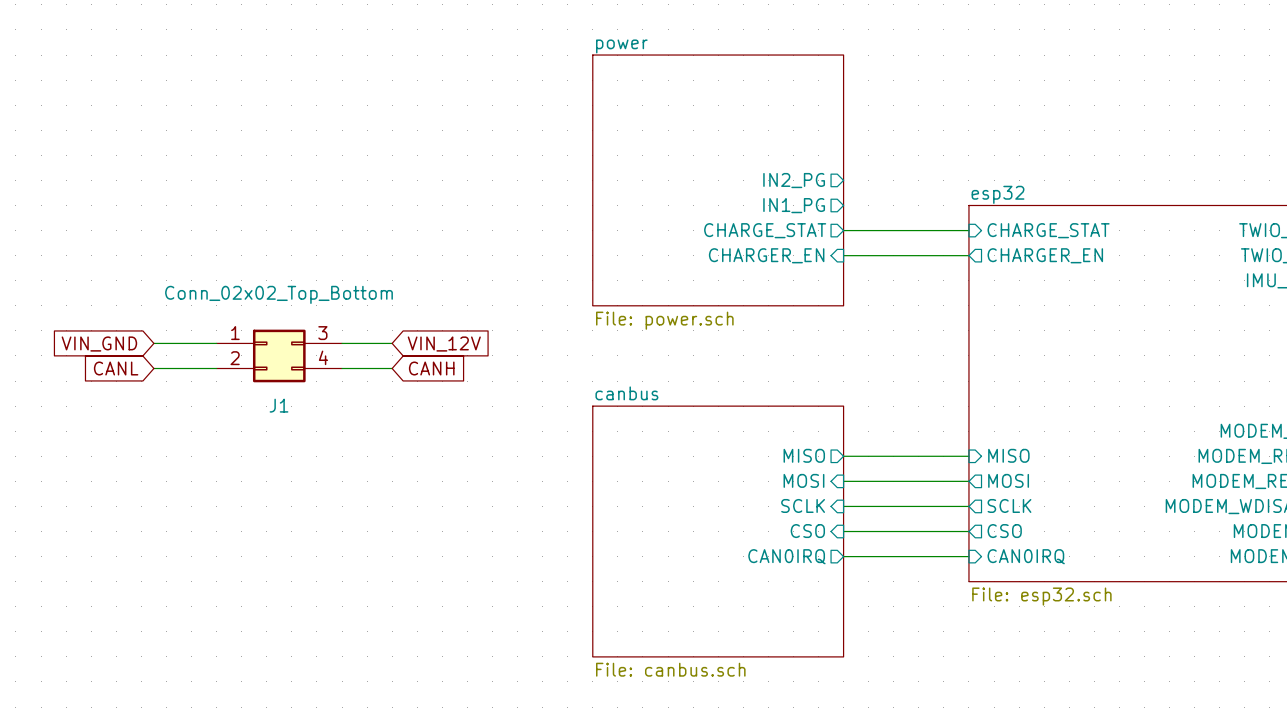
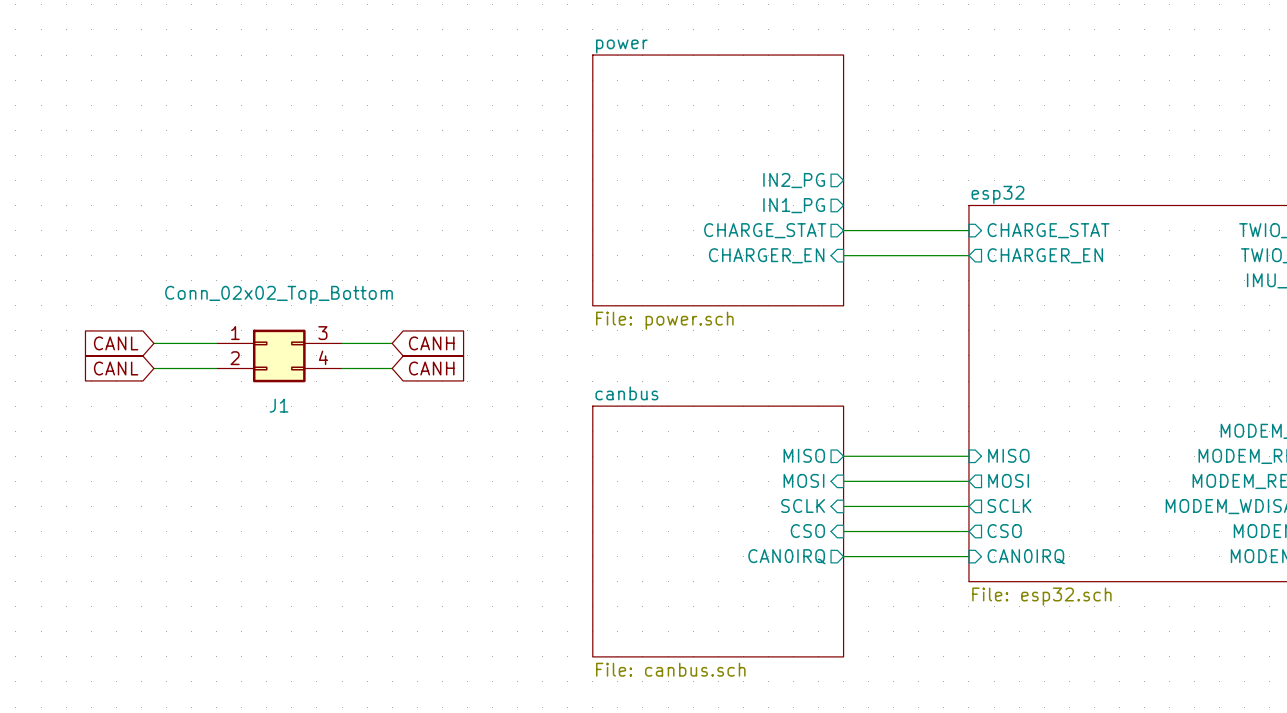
global label: VIN_GND (99, 344) -> CANL (116, 343)
global label: VIN_12V (444, 344) -> CANH (431, 343)

